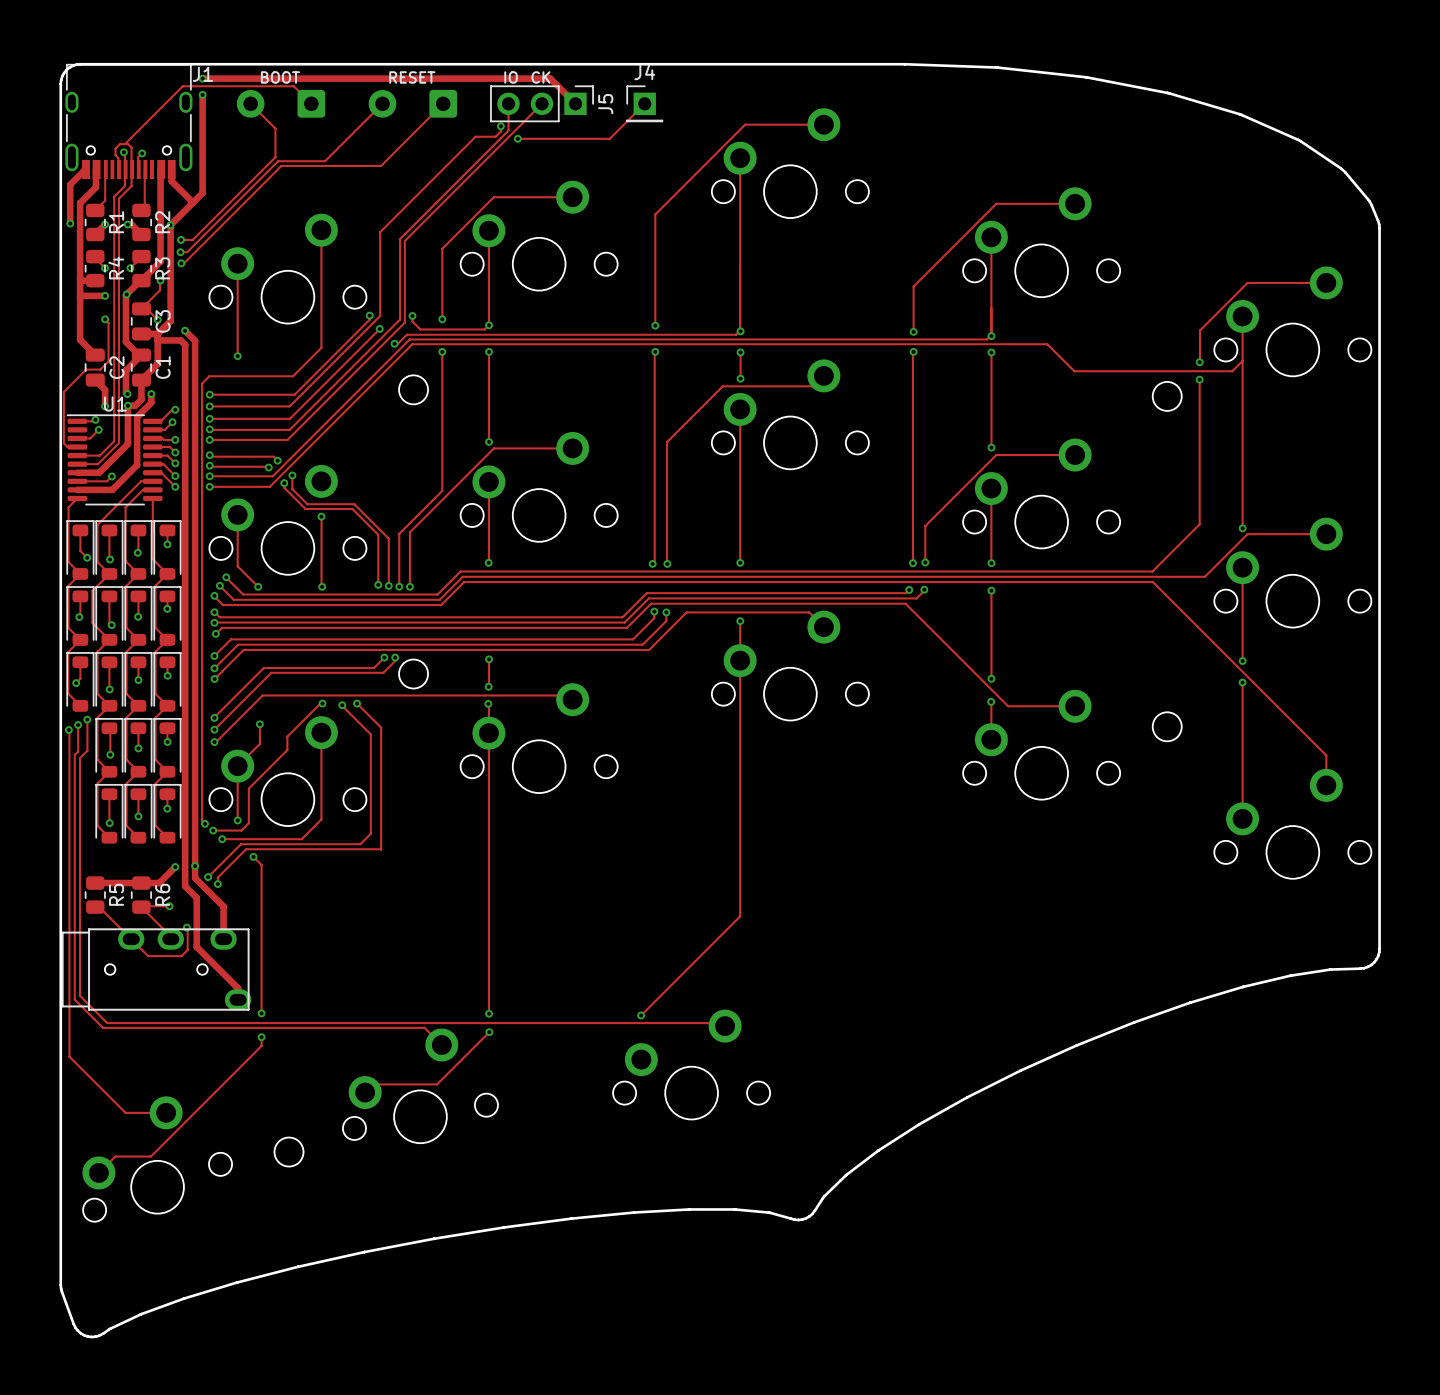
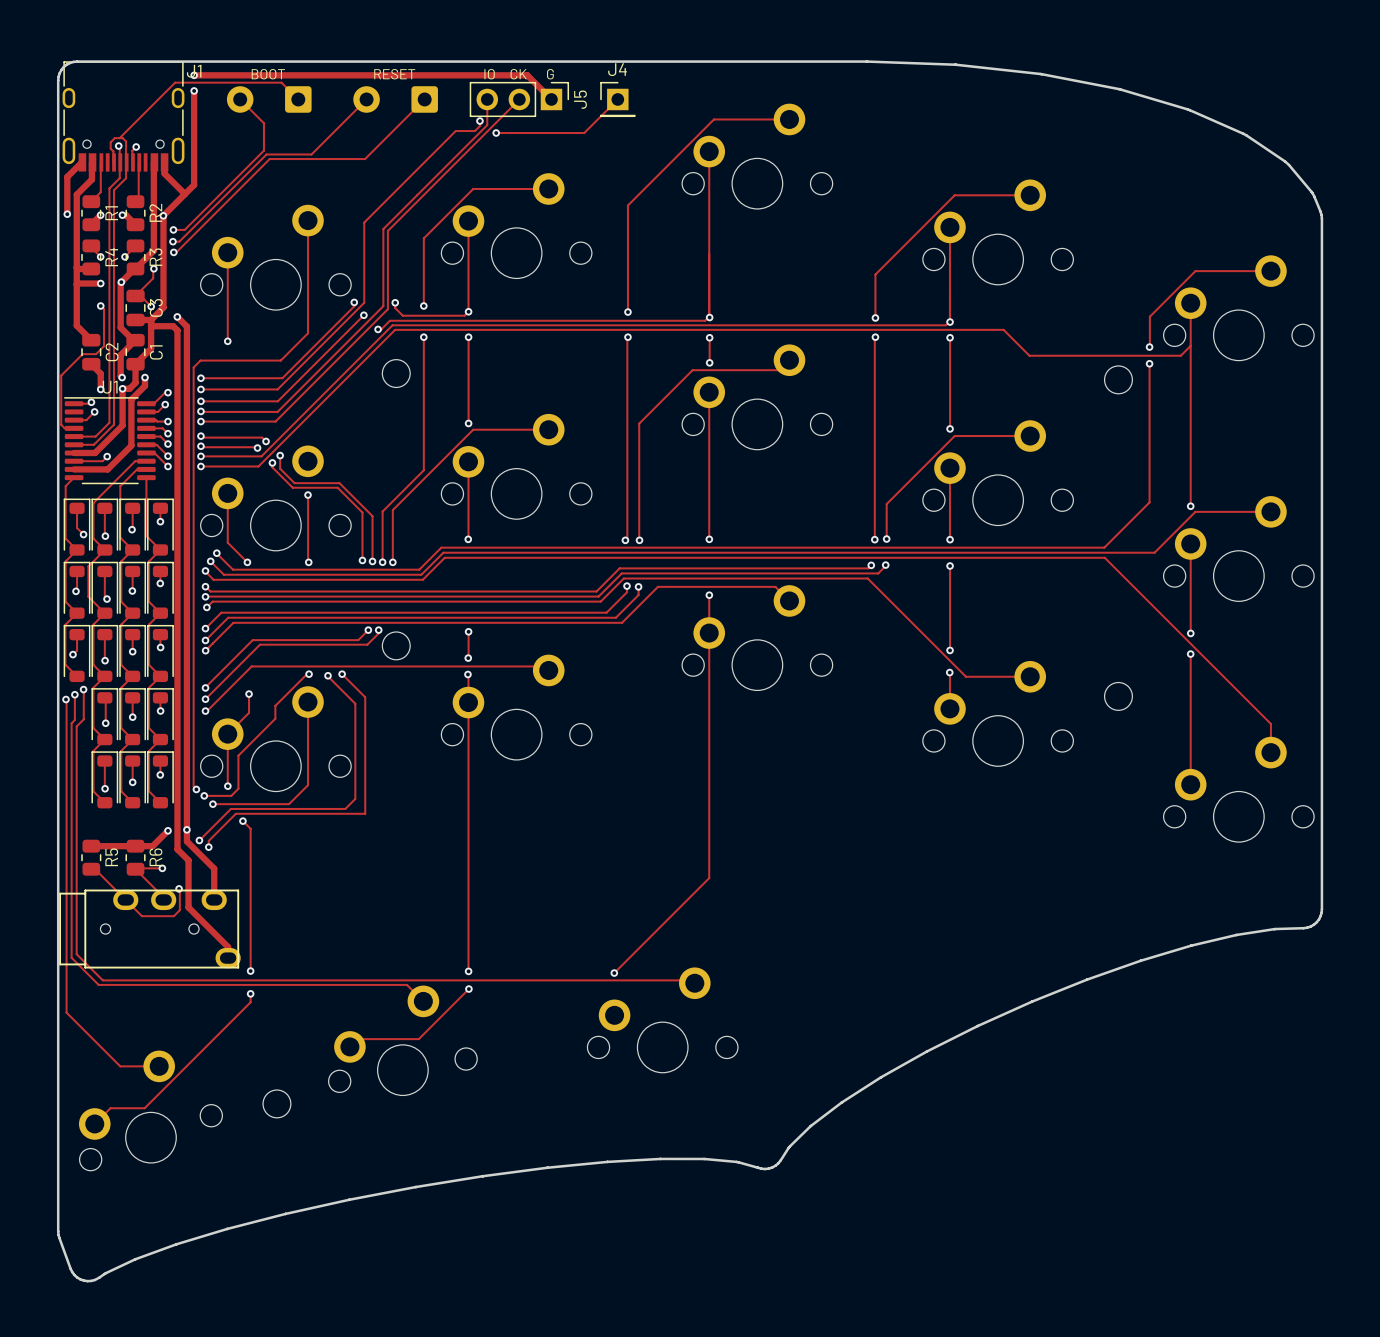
text: none -> G (550, 74)

